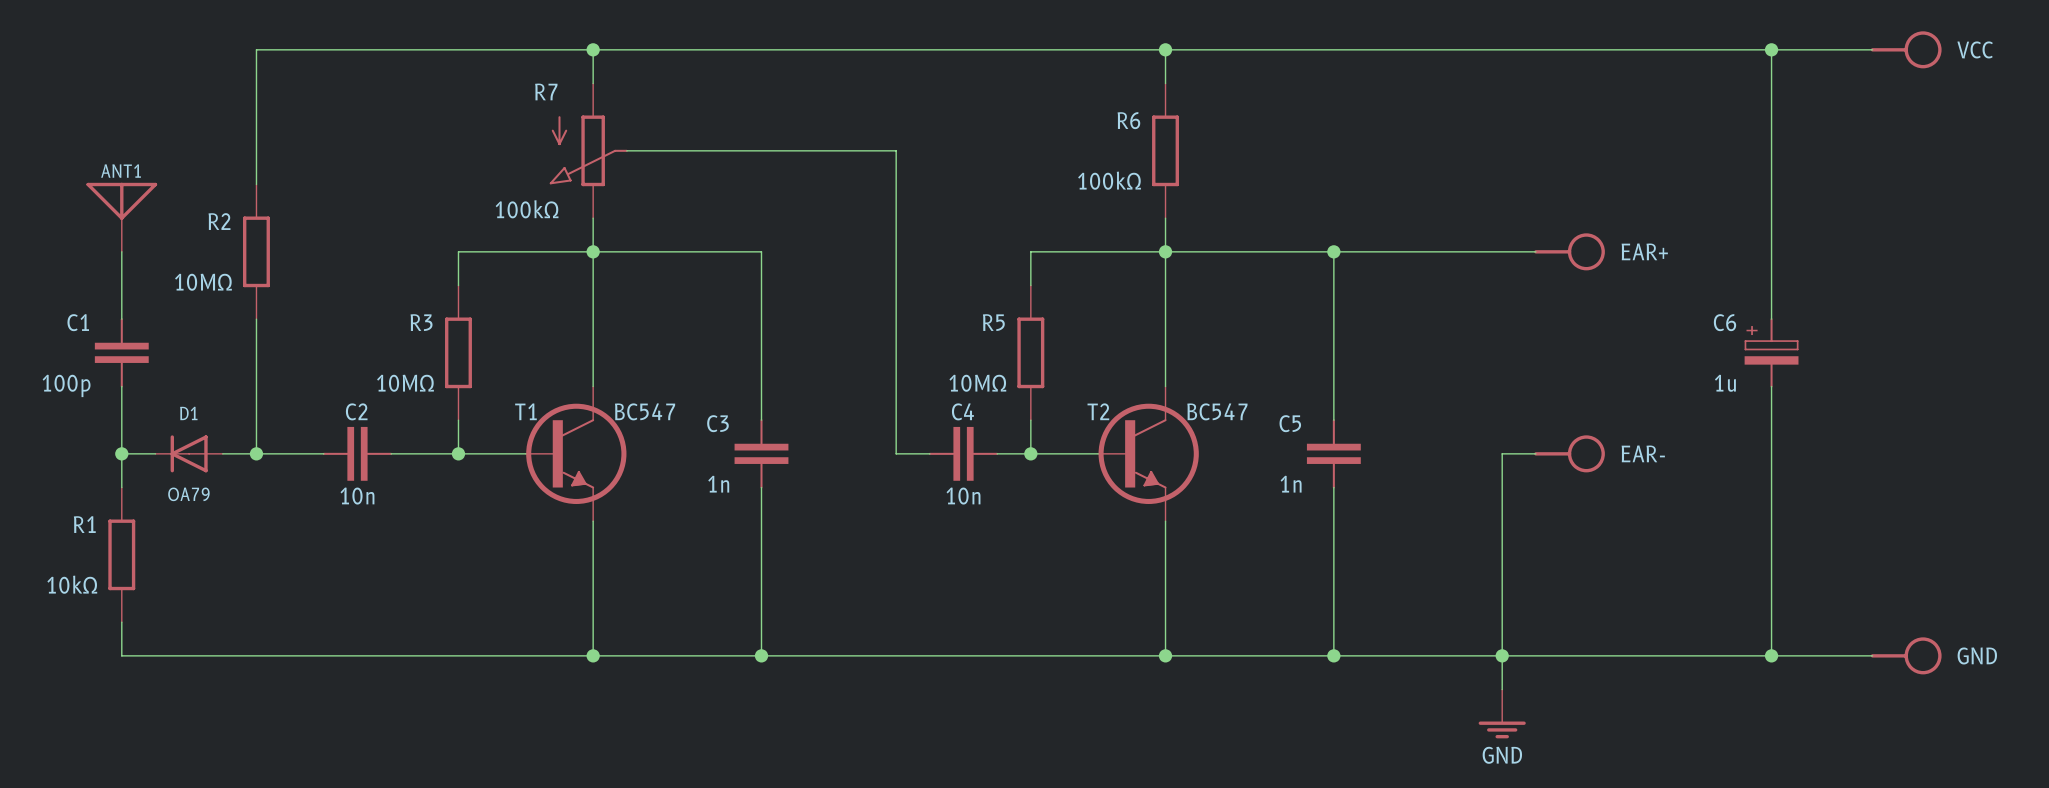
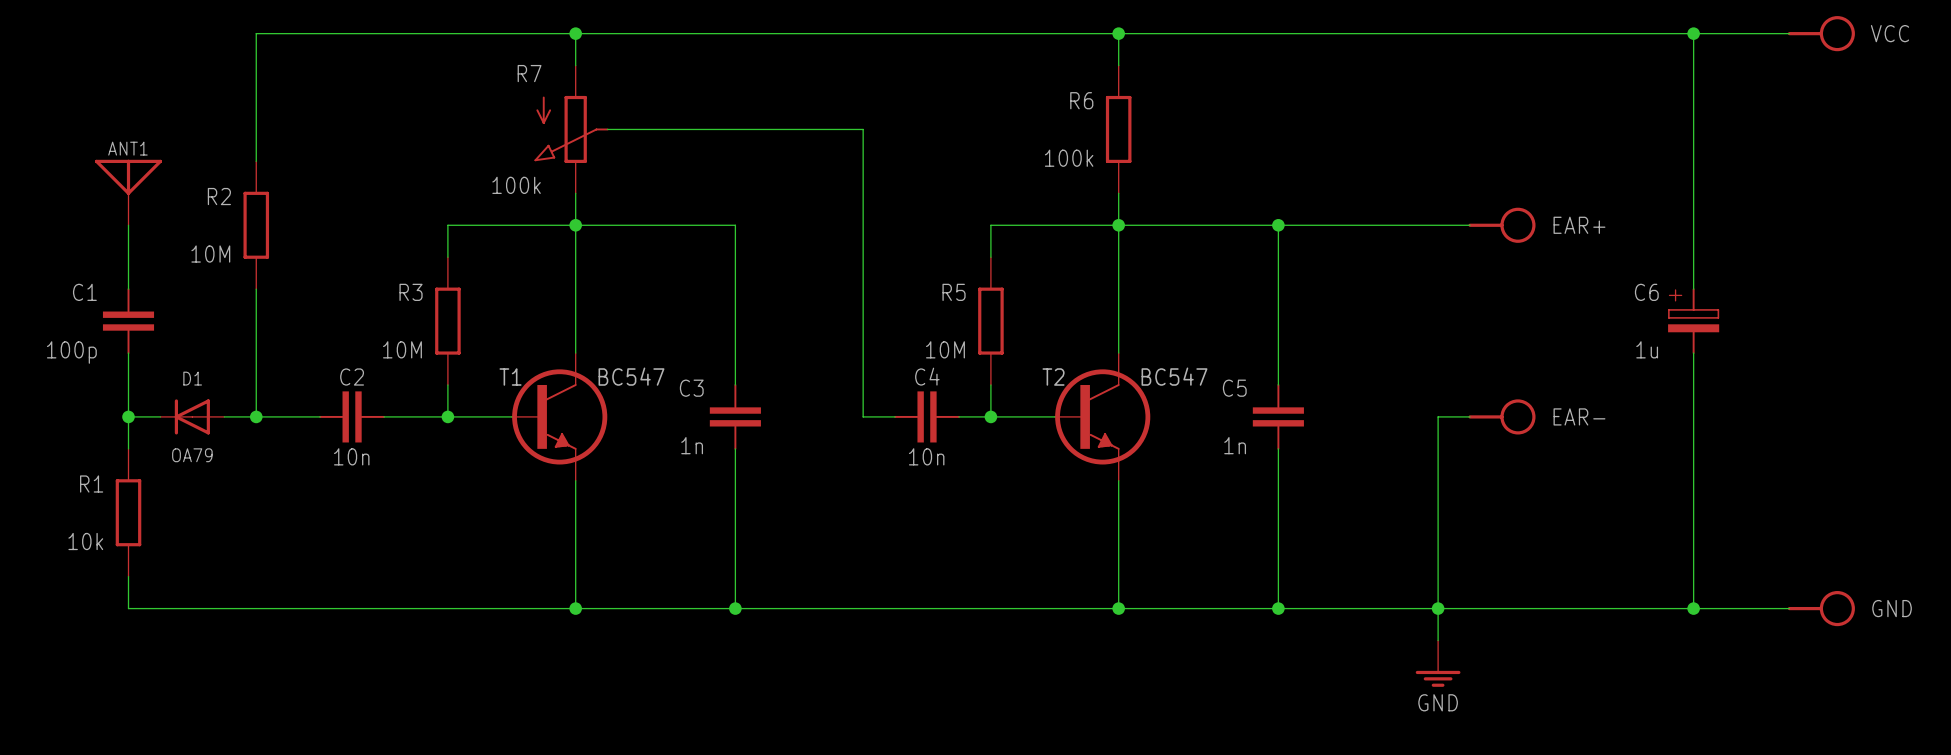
R6 value: 100kΩ (1109, 180) -> 100k (1069, 158)
R7 value: 100kΩ (527, 209) -> 100k (516, 185)
R2 value: 10MΩ (203, 282) -> 10M (210, 254)
R3 value: 10MΩ (405, 383) -> 10M (402, 349)
R5 value: 10MΩ (977, 383) -> 10M (945, 349)
R1 value: 10kΩ (72, 584) -> 10k (85, 541)

